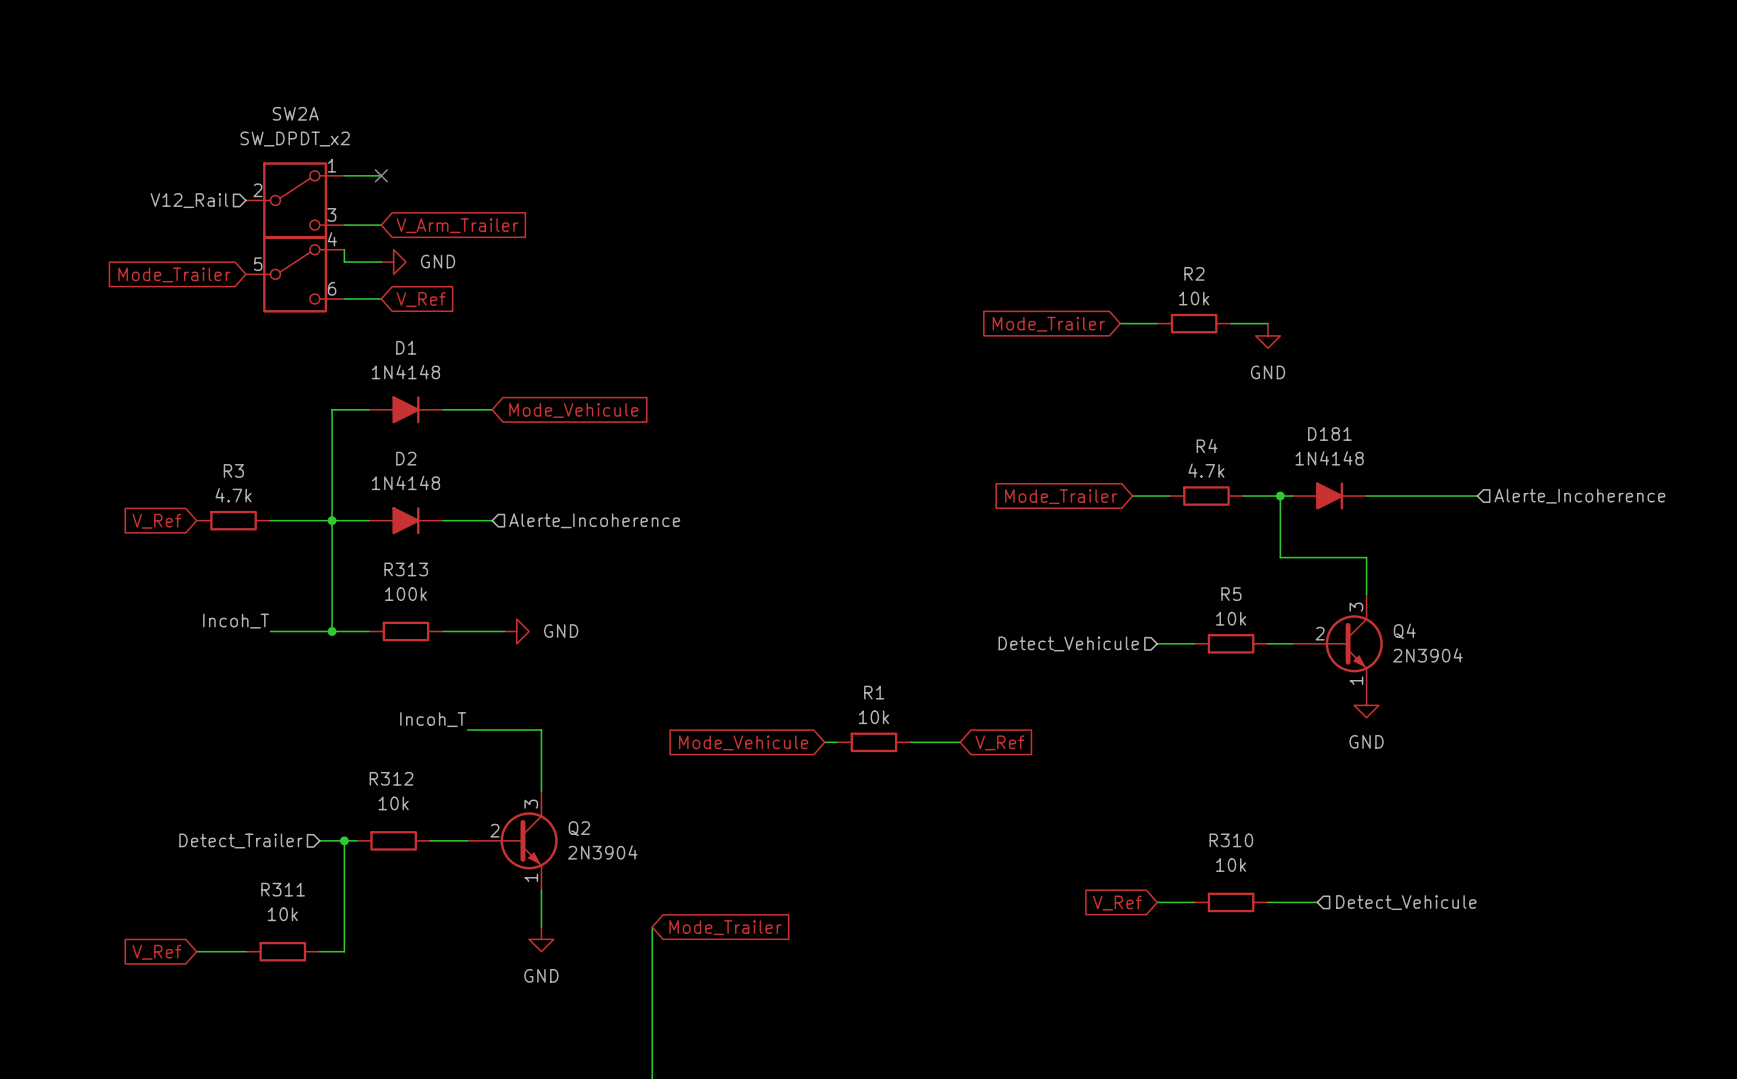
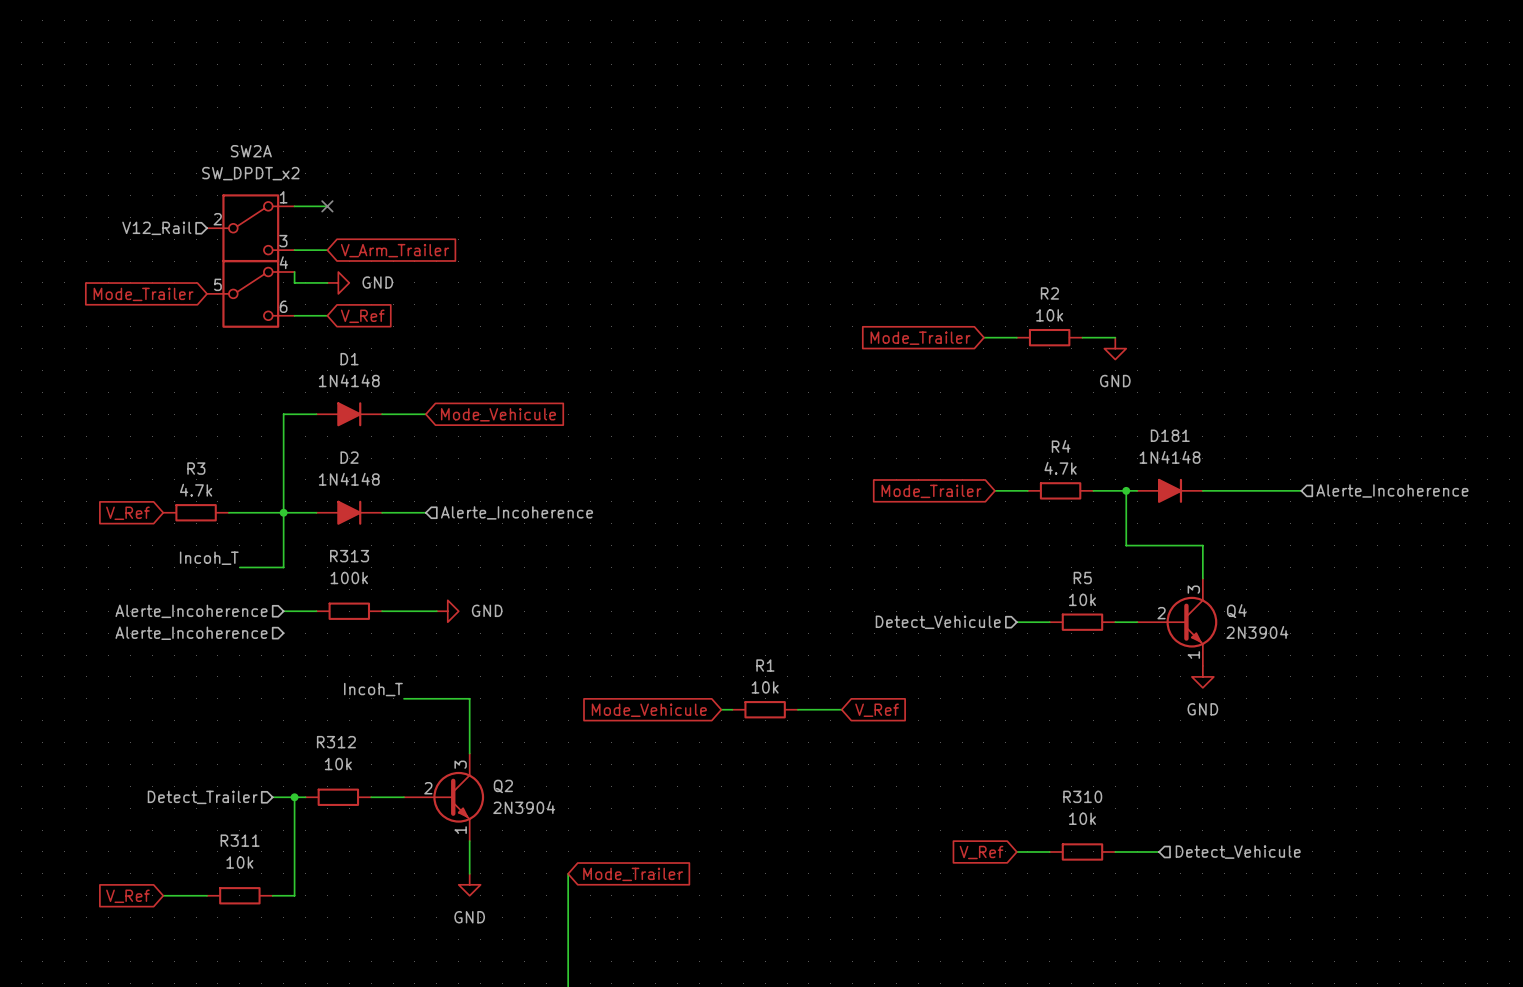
wire: (332, 582) (332, 631) (270, 631) -> (283, 567) (239, 567)
label position: Incoh_T (236, 621) -> Incoh_T (209, 558)
hierarchical label: none -> Alerte_Incoherence (191, 611)
junction: (332, 631) -> none
hierarchical label: none -> Alerte_Incoherence (191, 633)

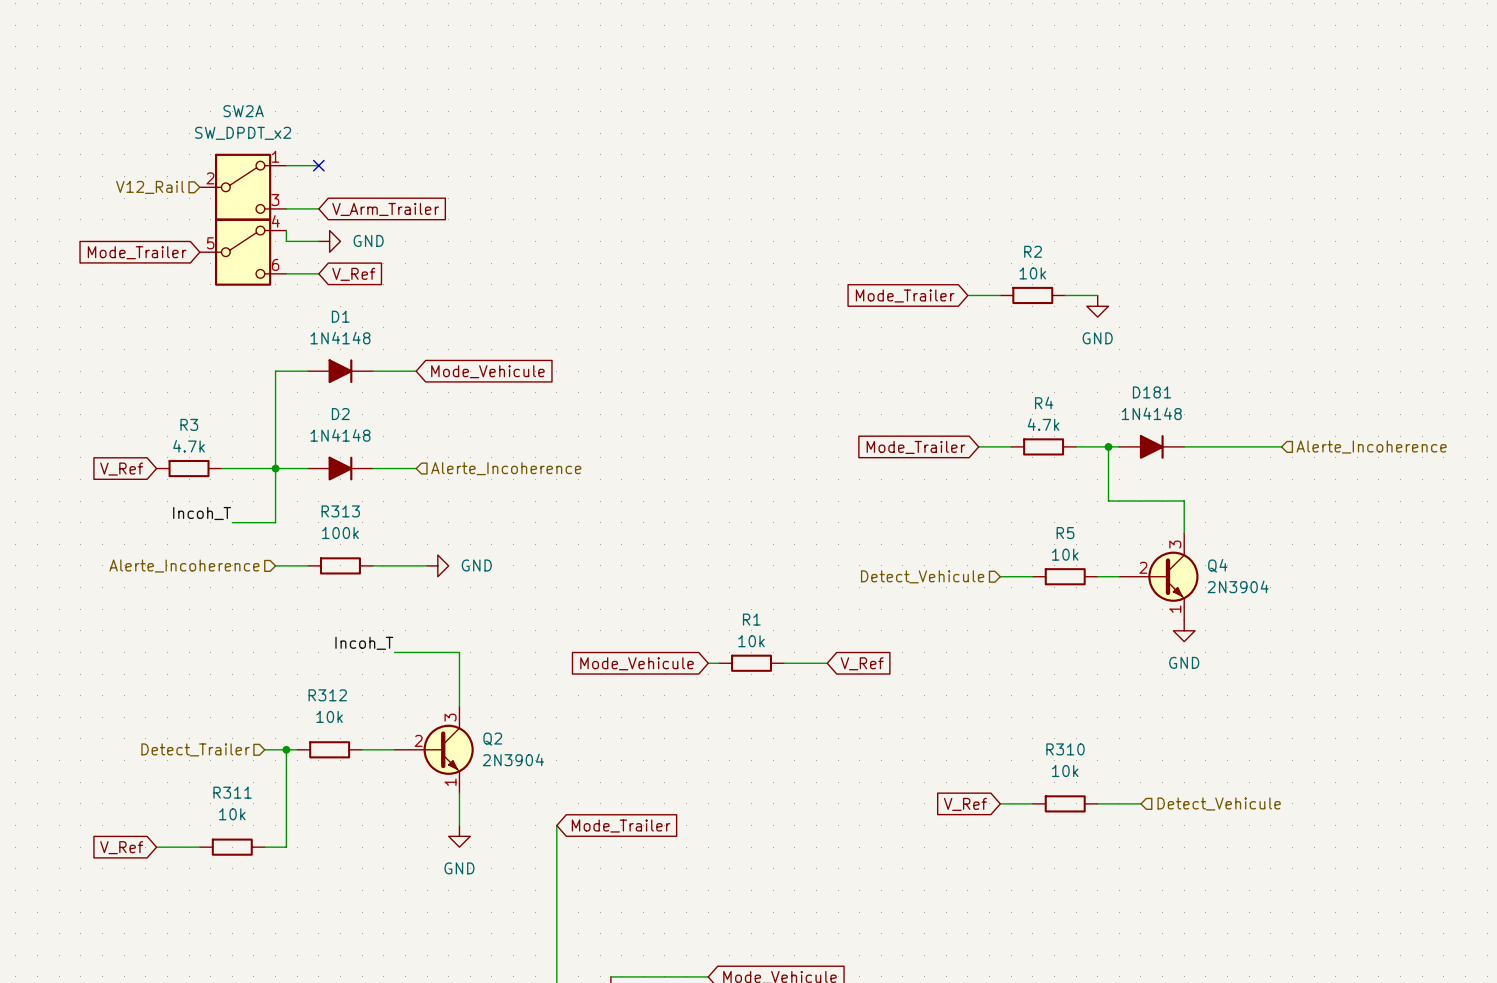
hierarchical label: Alerte_Incoherence (191, 633) -> none

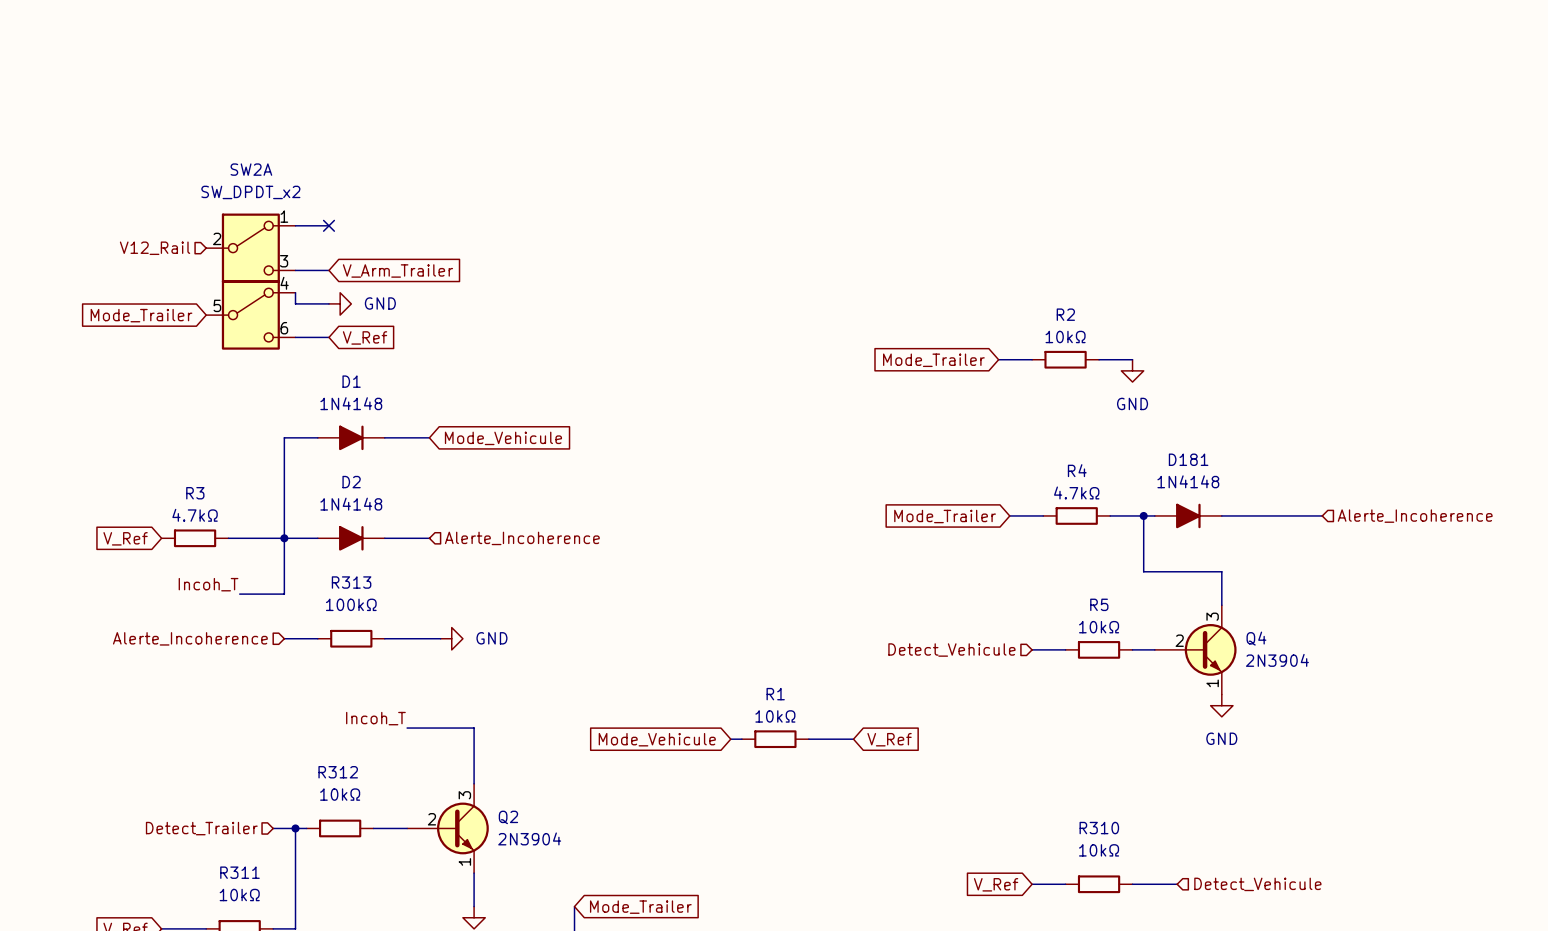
R2 value: 10k (1032, 273) -> 10kΩ (1065, 336)
R4 value: 4.7k (1043, 424) -> 4.7kΩ (1076, 492)
R3 value: 4.7k (189, 446) -> 4.7kΩ (195, 515)
R313 value: 100k (340, 533) -> 100kΩ (351, 604)
R5 value: 10k (1065, 554) -> 10kΩ (1099, 627)
R1 value: 10k (751, 641) -> 10kΩ (775, 716)
R312 value: 10k (329, 716) -> 10kΩ (340, 794)
R310 value: 10k (1065, 771) -> 10kΩ (1099, 850)
R311 value: 10k (232, 814) -> 10kΩ (239, 895)

